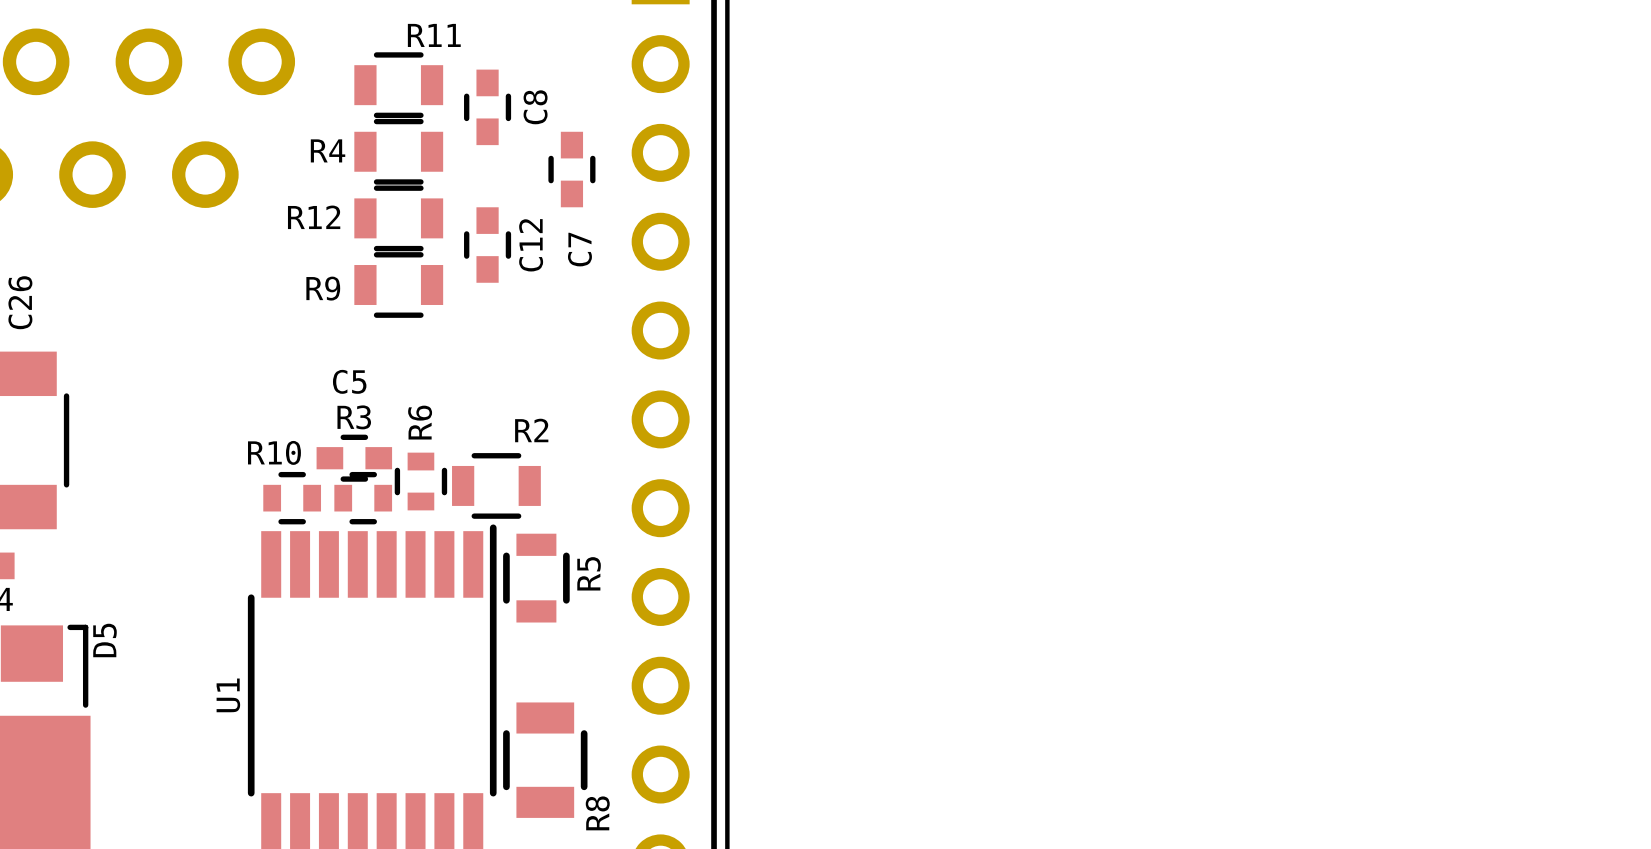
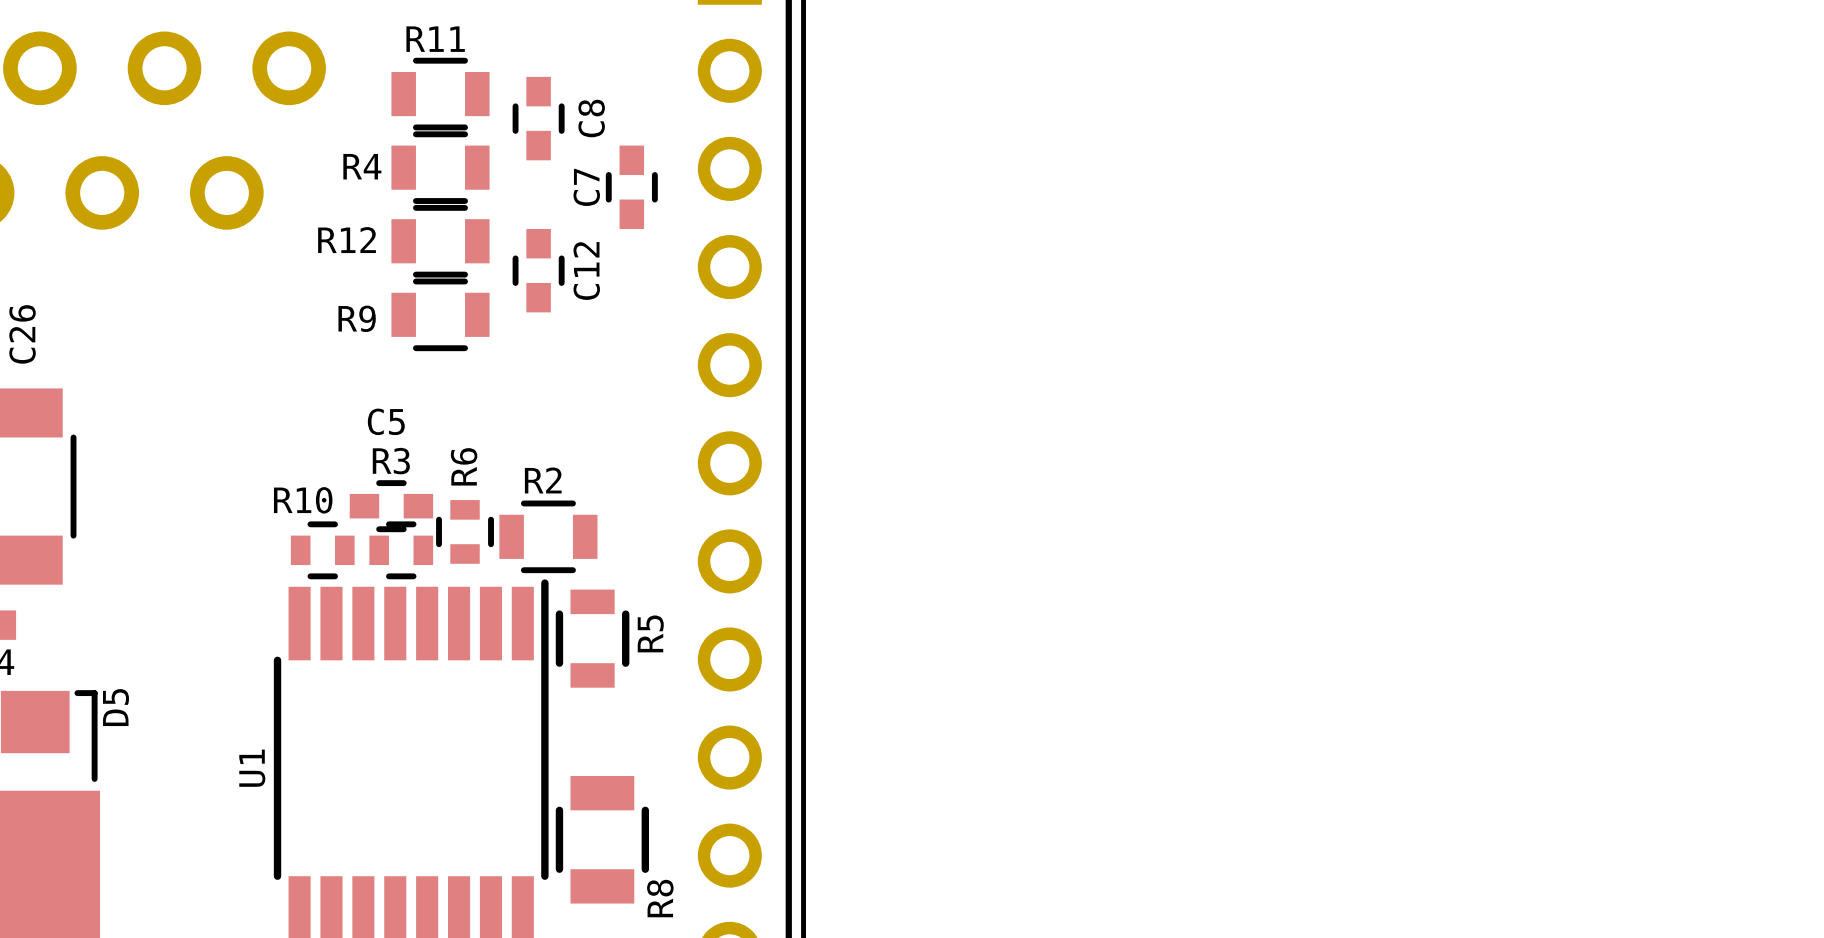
R11 name position: R11 (434, 35) -> R11 (435, 39)
C7 name position: C7 (579, 249) -> C7 (586, 187)
R2 name position: R2 (531, 430) -> R2 (543, 480)

